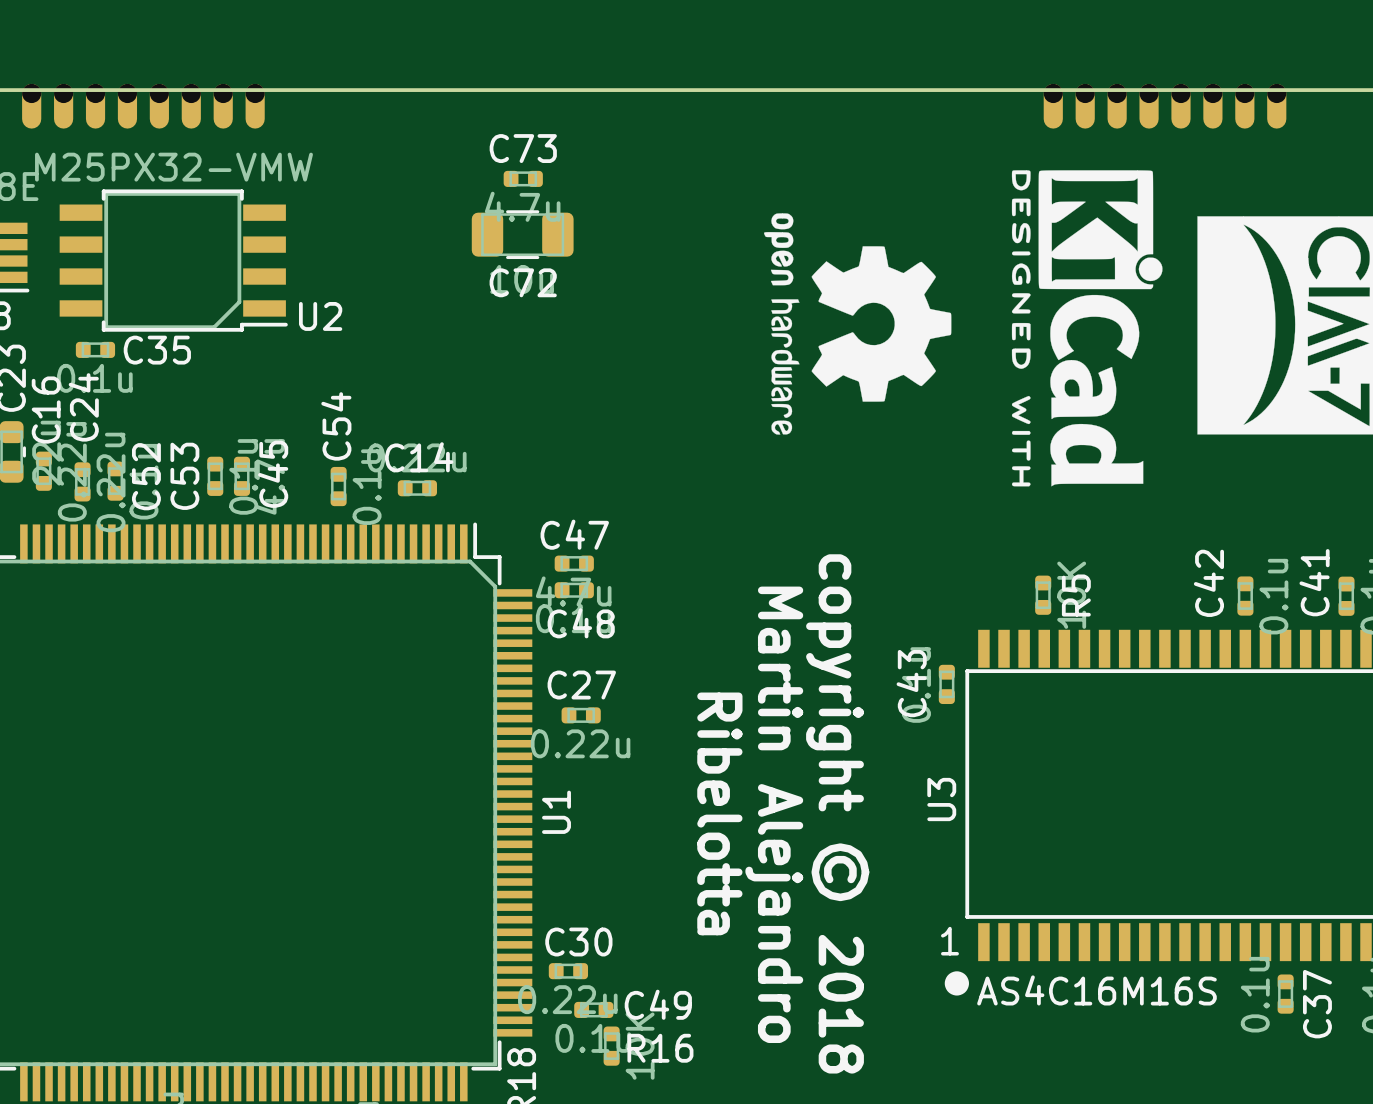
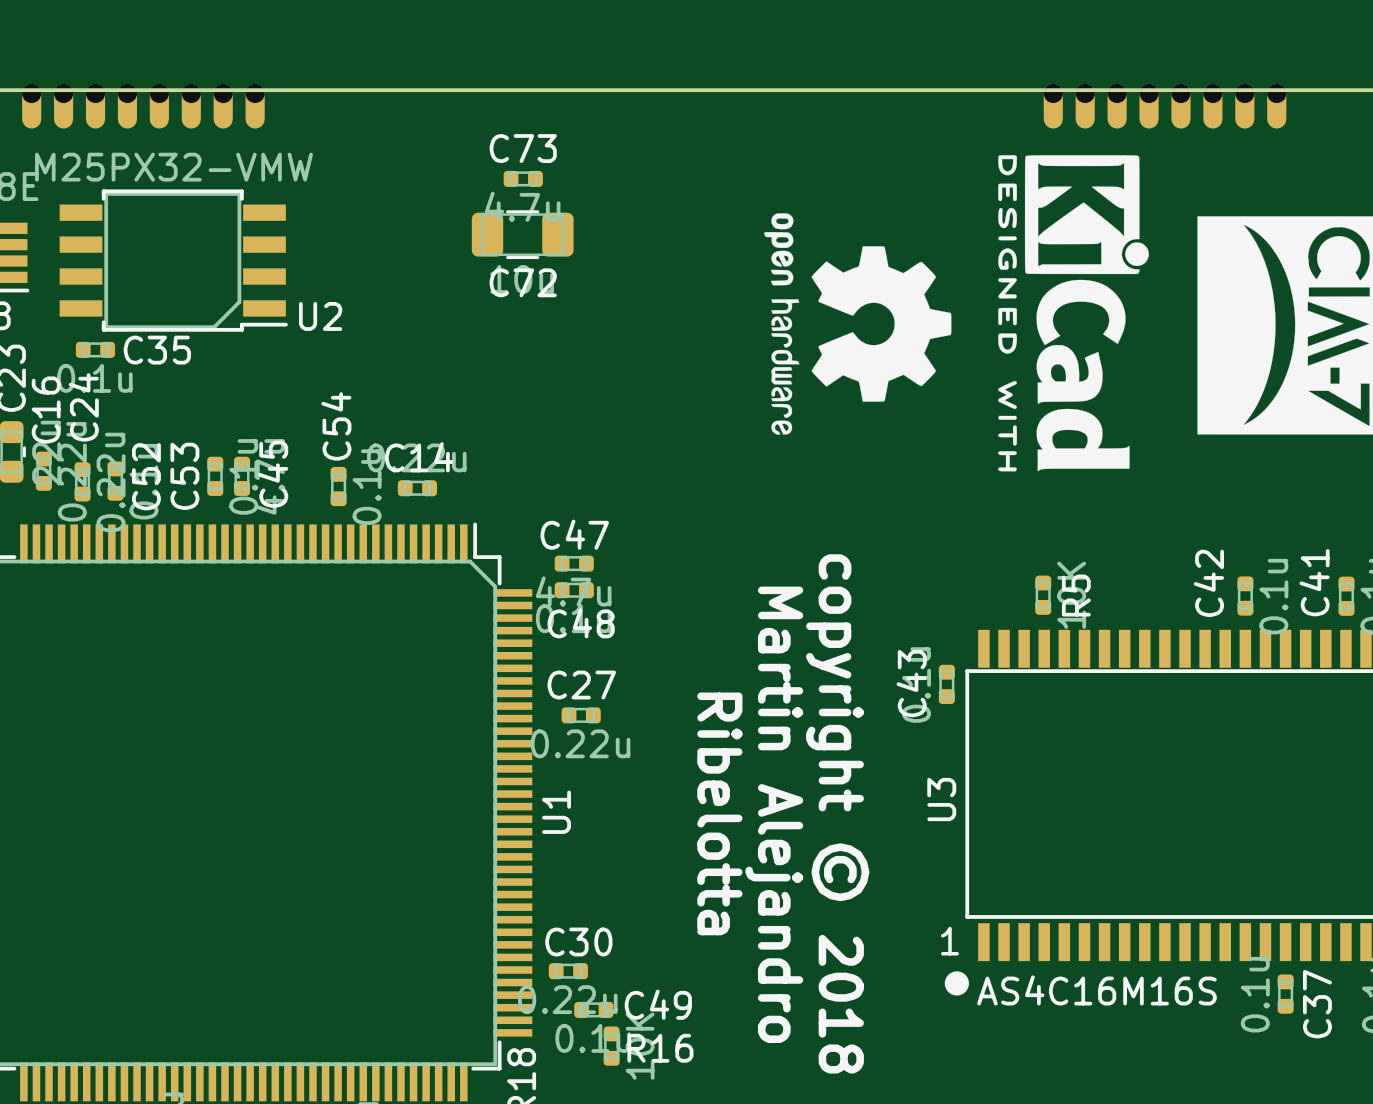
drawing position: (1087, 328) -> (1073, 313)

